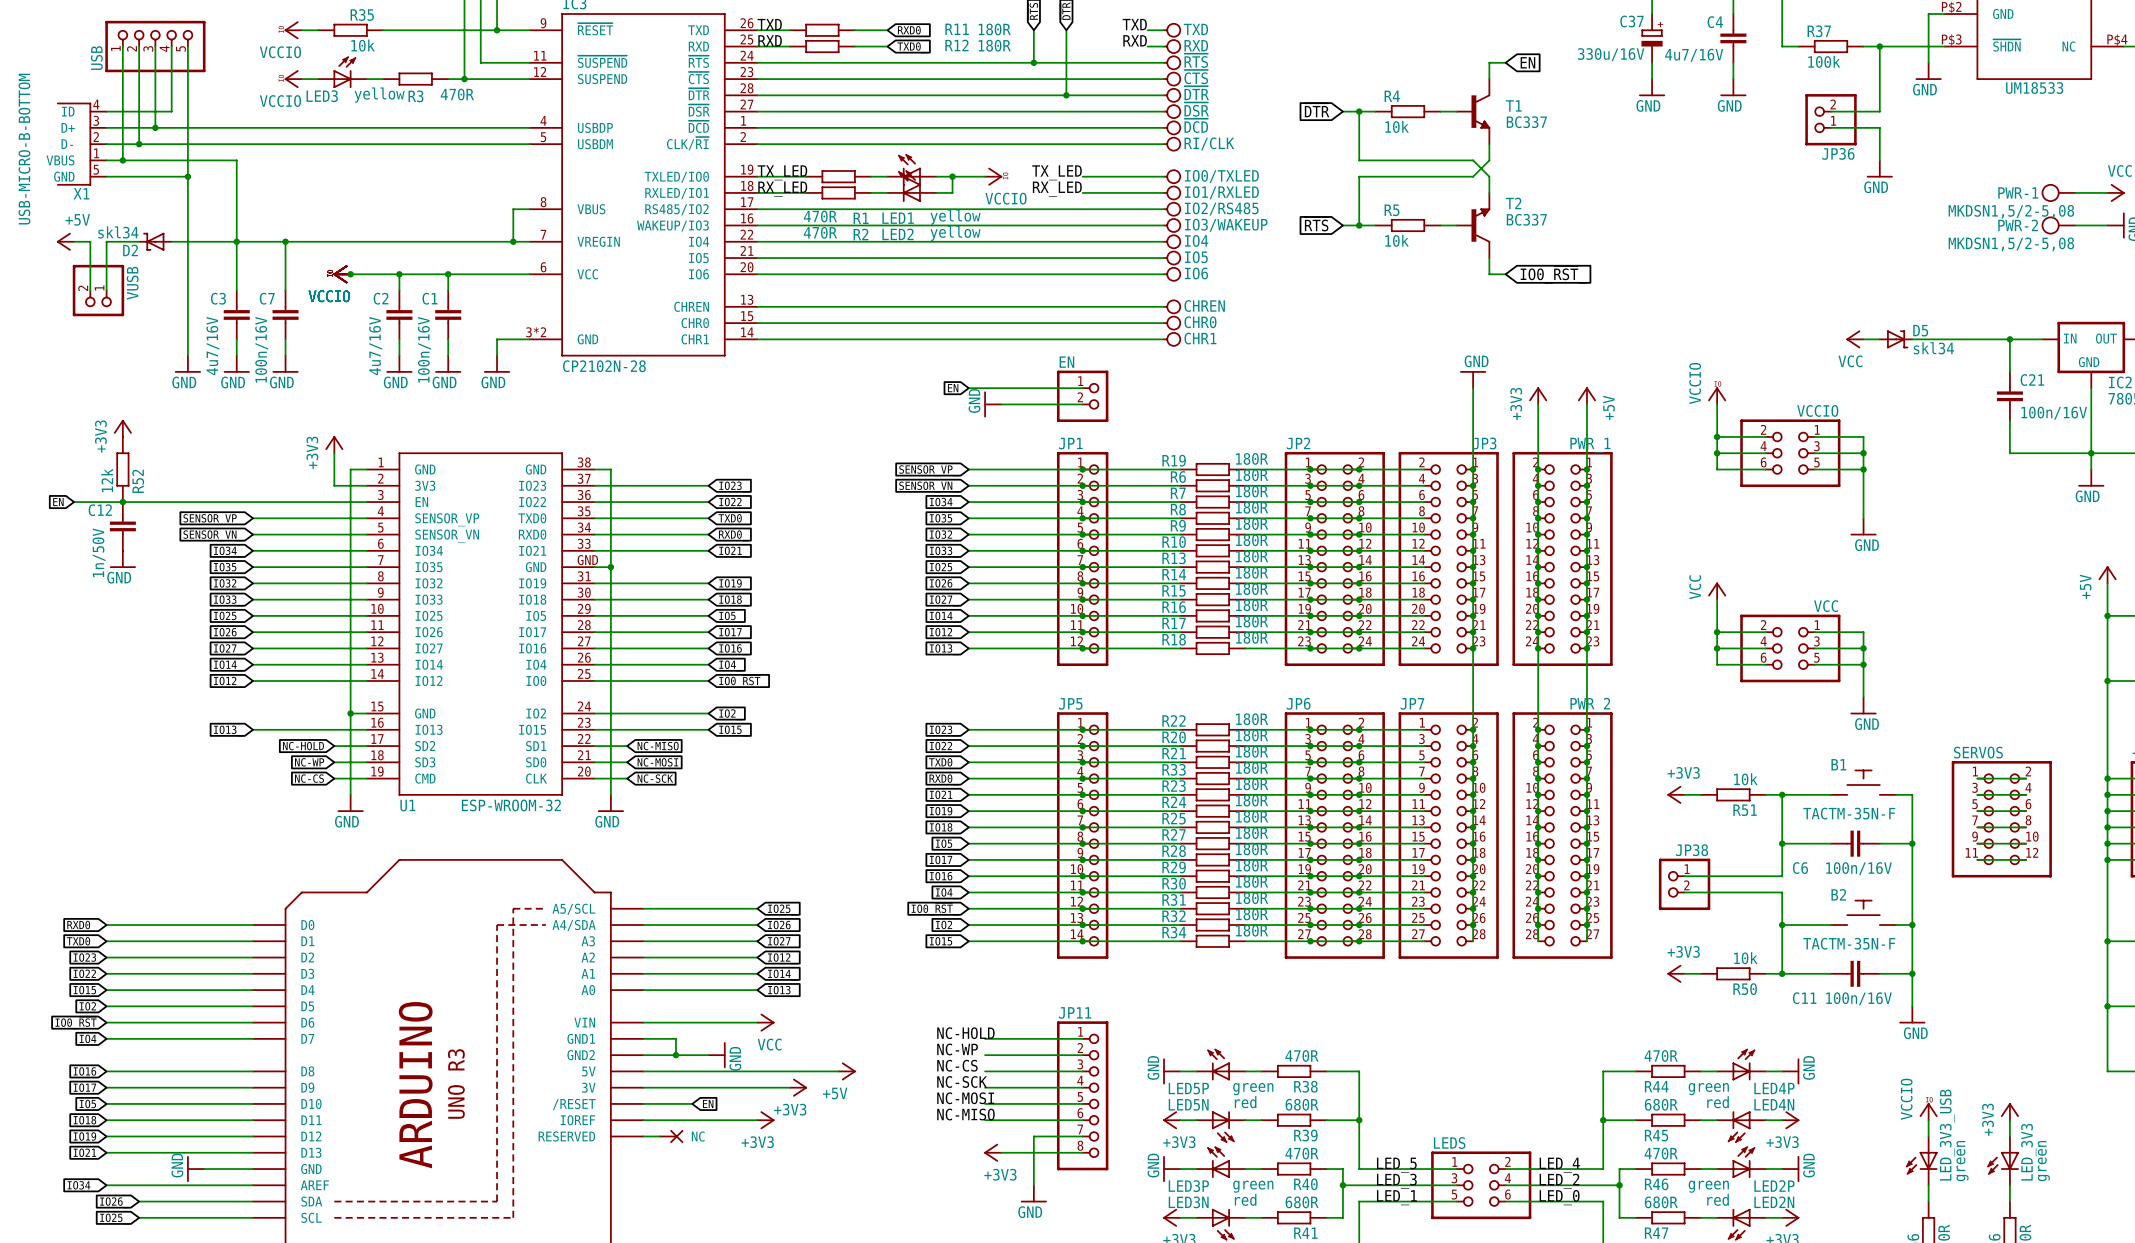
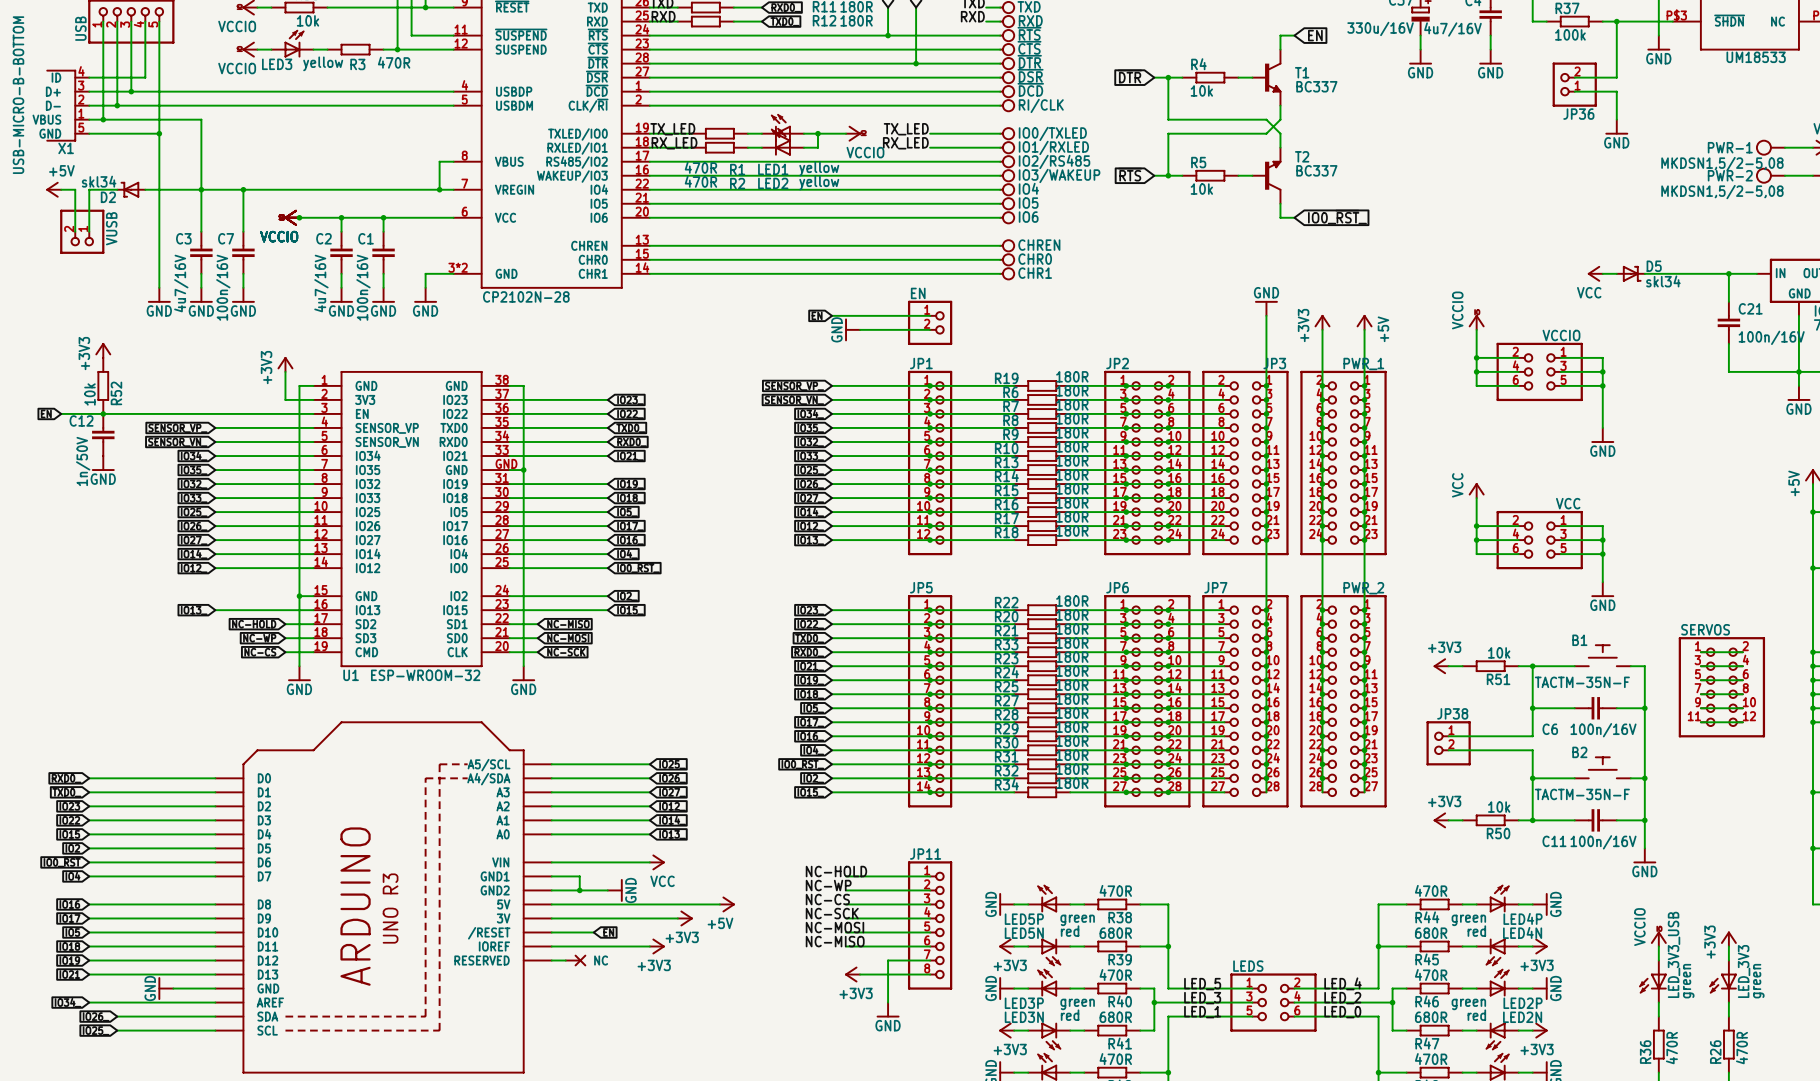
R52 value: 12k (107, 480) -> 10k (89, 394)

